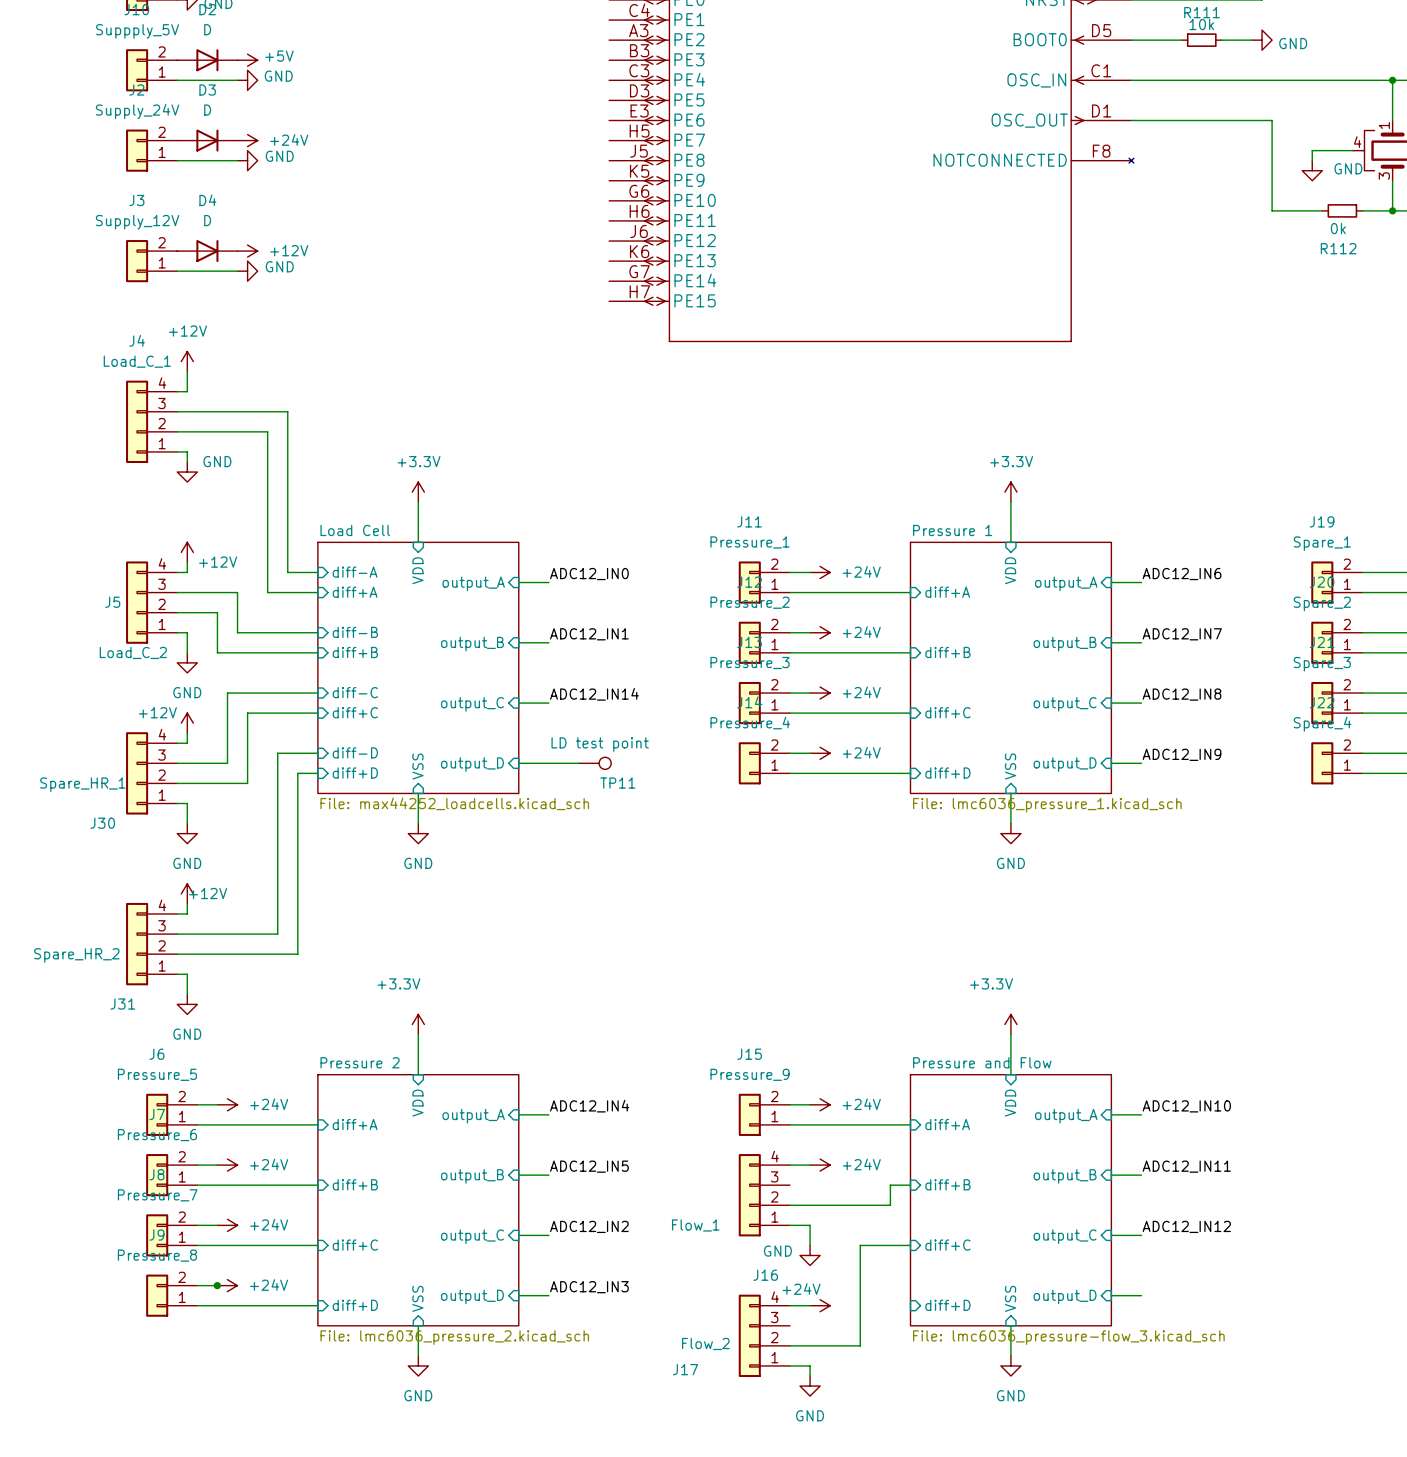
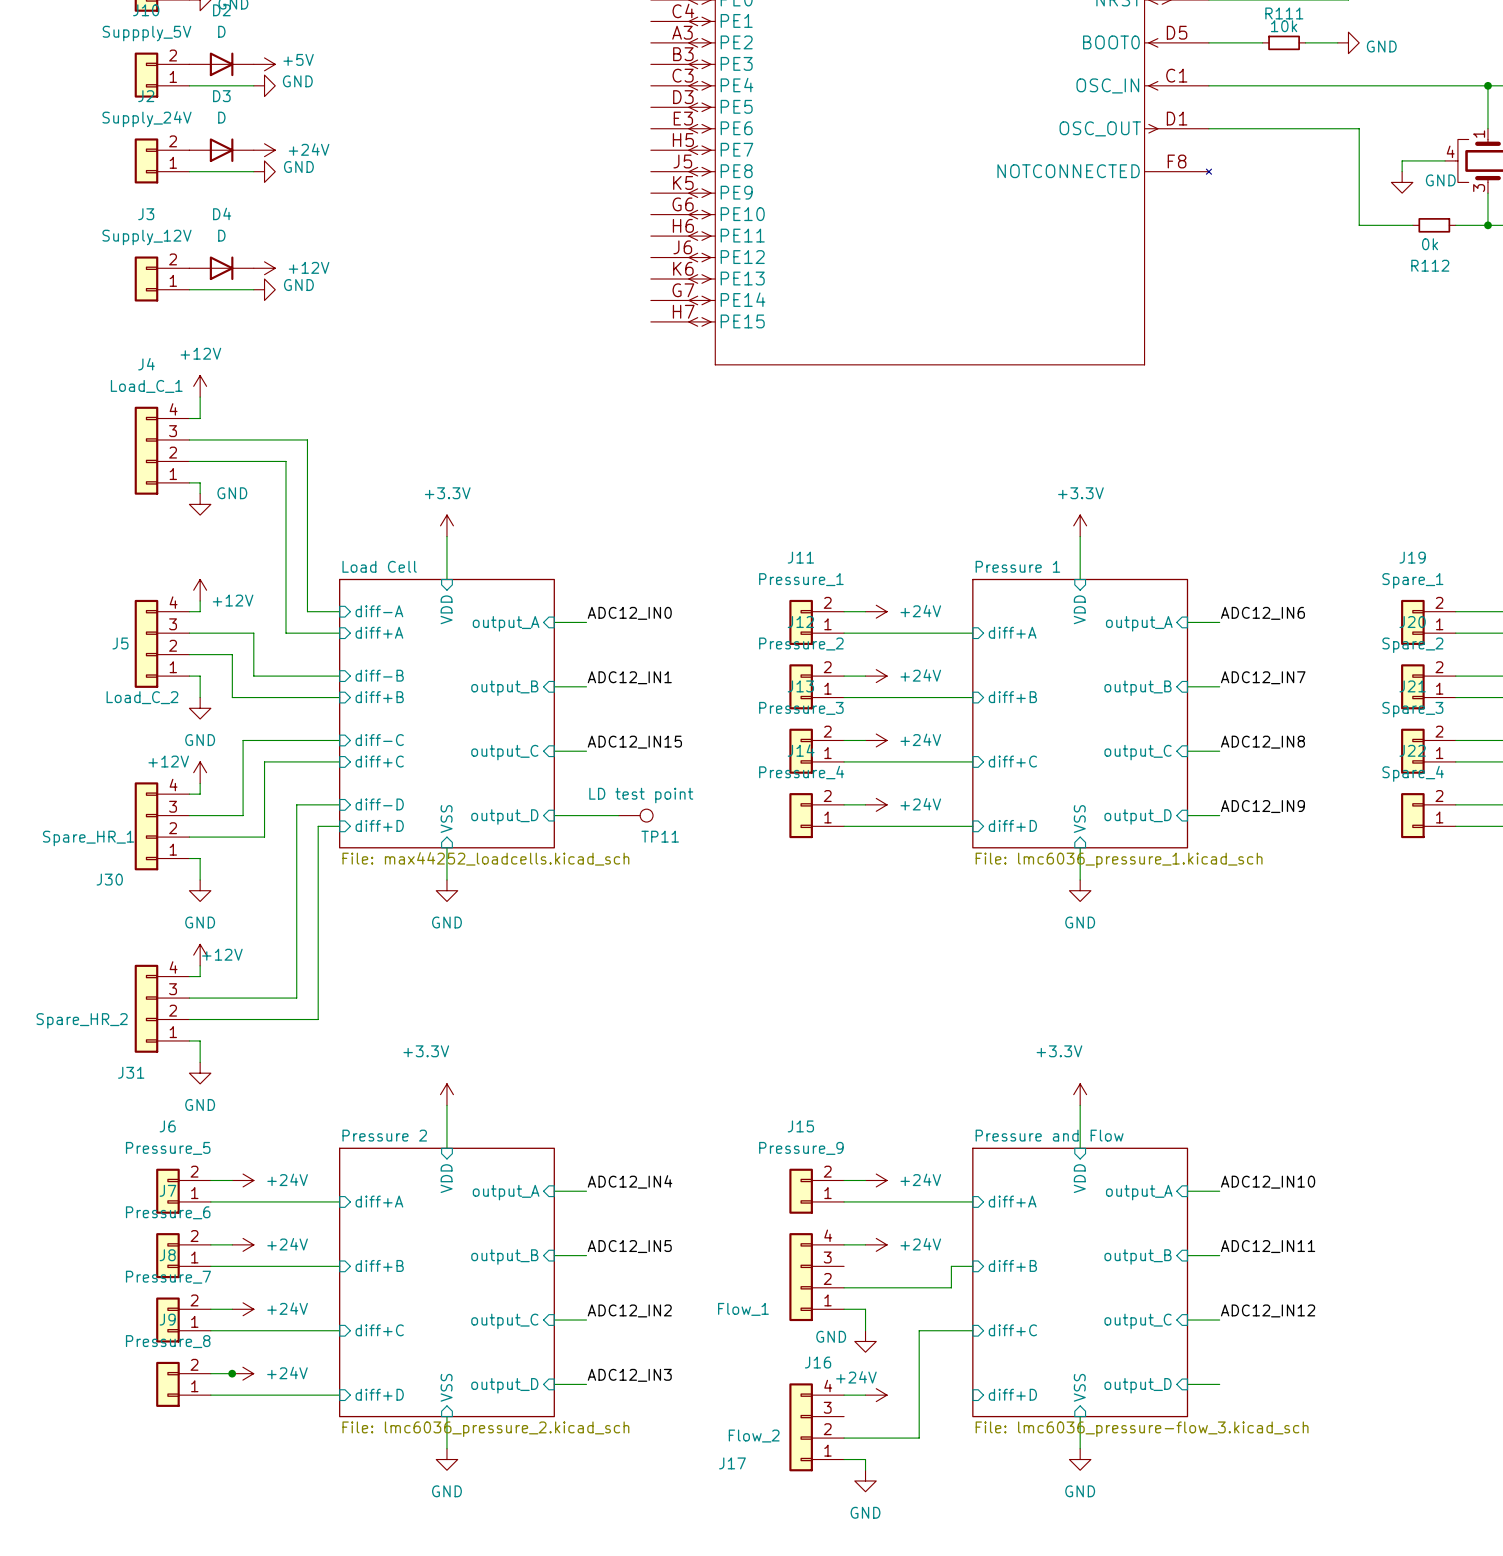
label: ADC12_IN14 (594, 694) -> ADC12_IN15 (634, 742)

